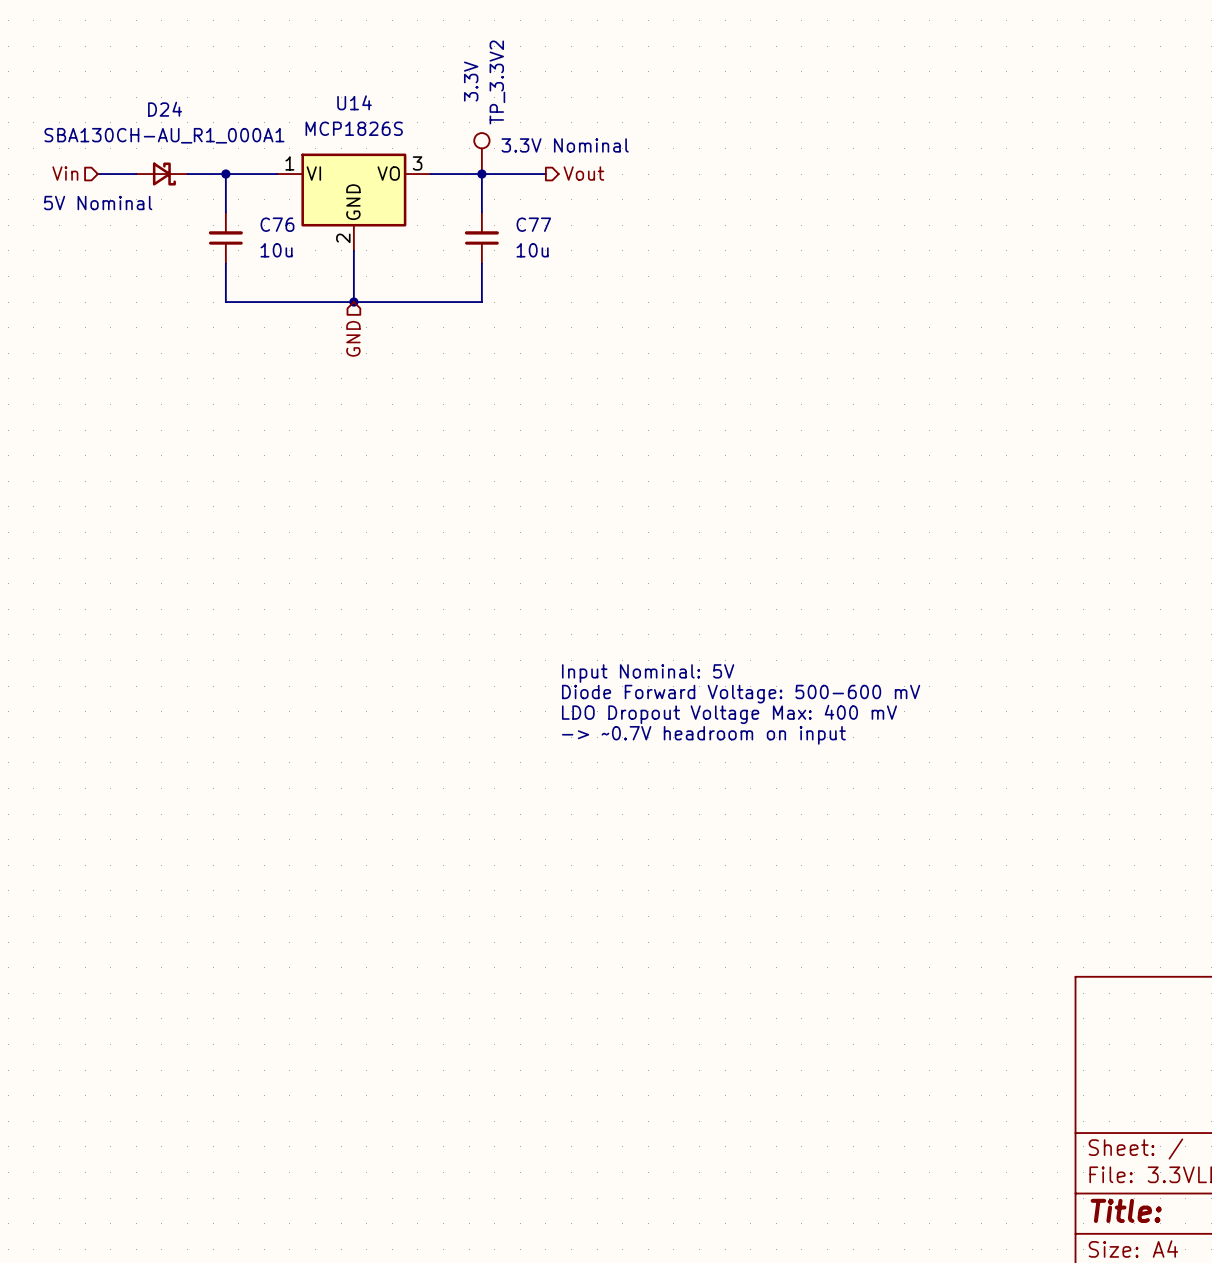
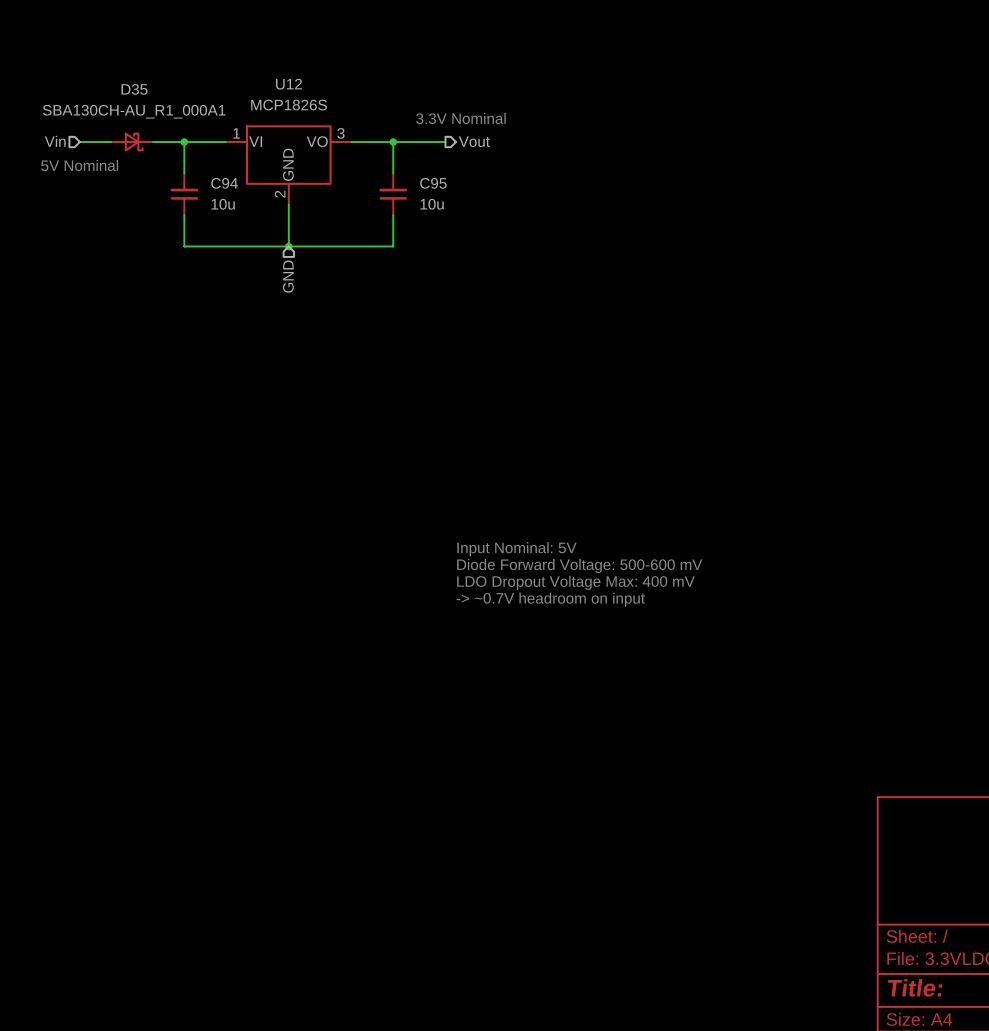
U14 name: U14 (354, 102) -> U12 (289, 84)
D24 name: D24 (165, 109) -> D35 (134, 89)
TP_3.3V2: 3.3V (481, 153) -> none
C76 name: C76 (277, 224) -> C94 (224, 183)
C77 name: C77 (533, 224) -> C95 (433, 183)

